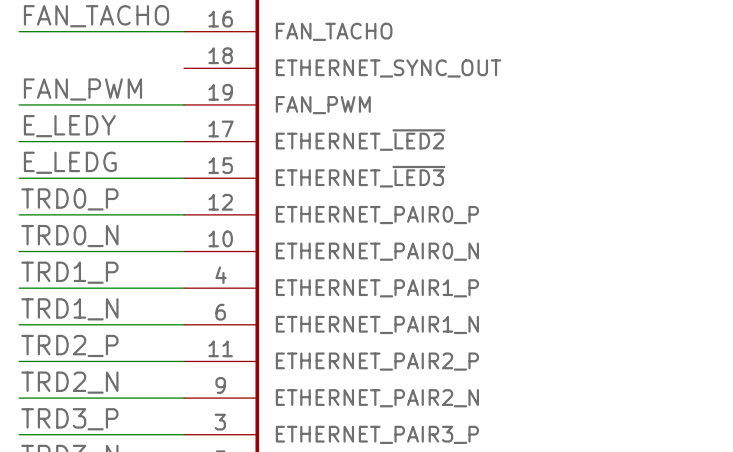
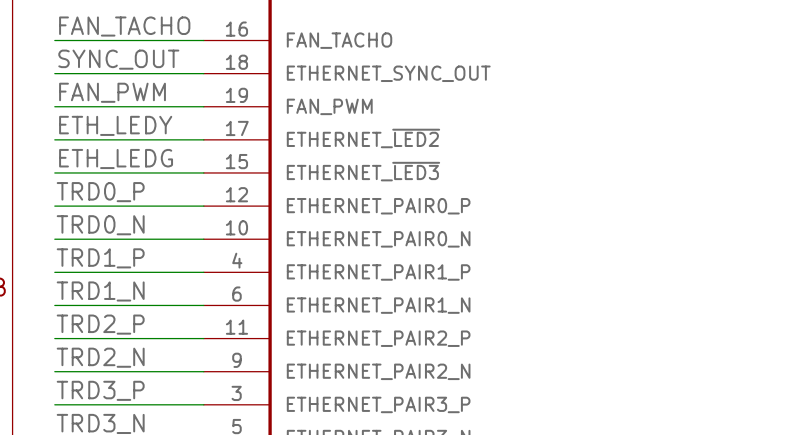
label: none -> SYNC_OUT (118, 59)
wire: none -> (54, 73) (203, 73)
label: E_LEDY (69, 126) -> ETH_LEDY (115, 125)
label: E_LEDG (70, 162) -> ETH_LEDG (116, 158)

